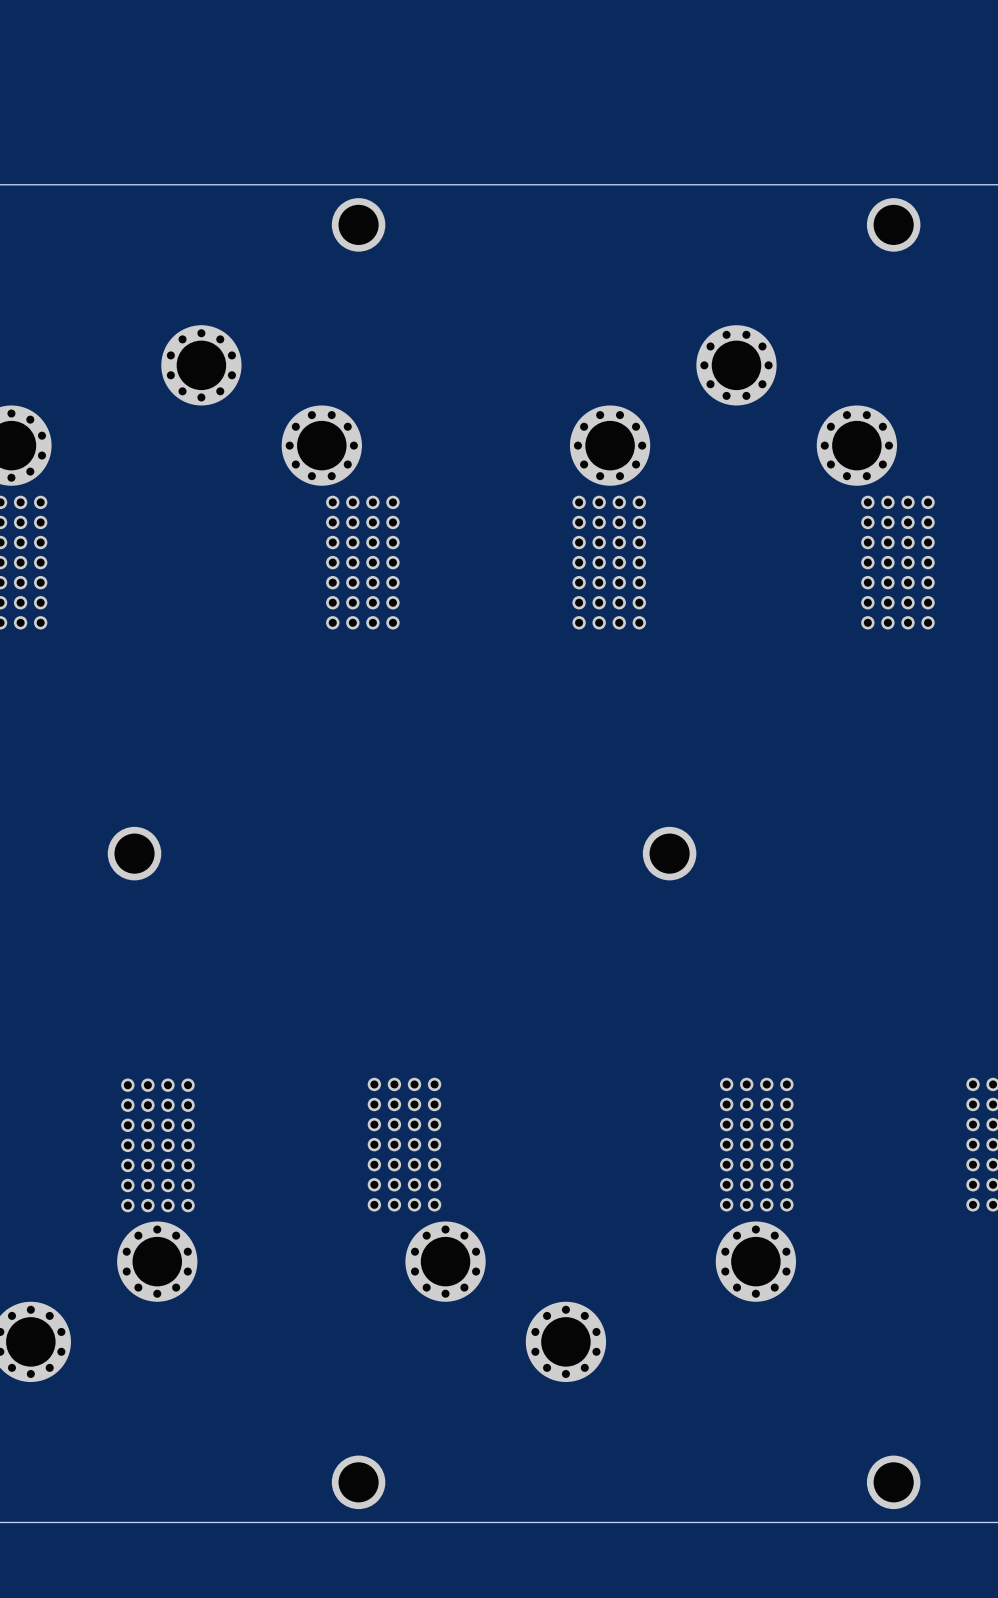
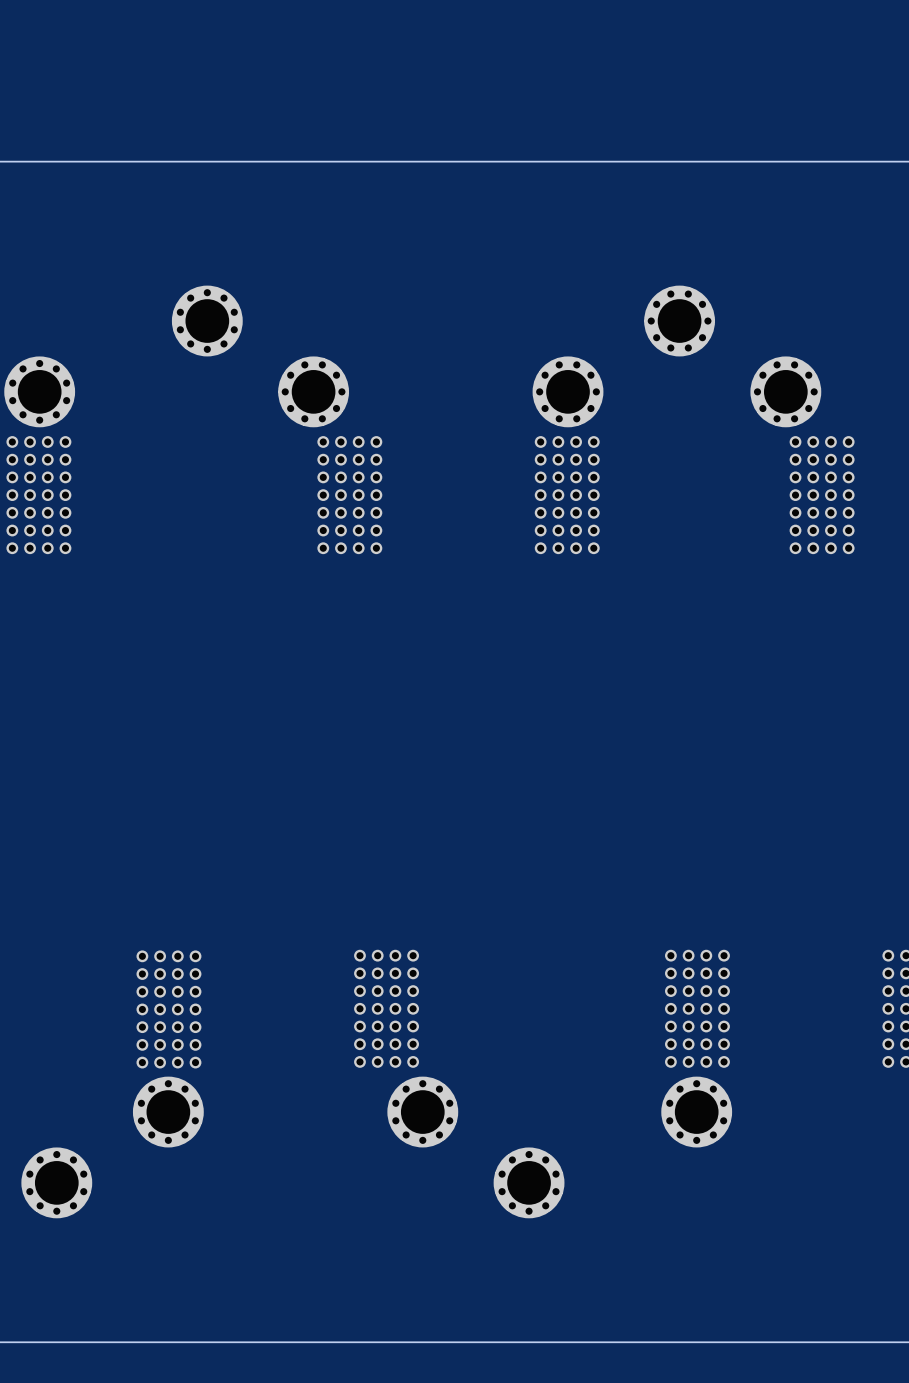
part: (358, 224) -> none
part: (893, 224) -> none
part: (134, 853) -> none
part: (669, 853) -> none
part: (358, 1482) -> none
part: (893, 1482) -> none

